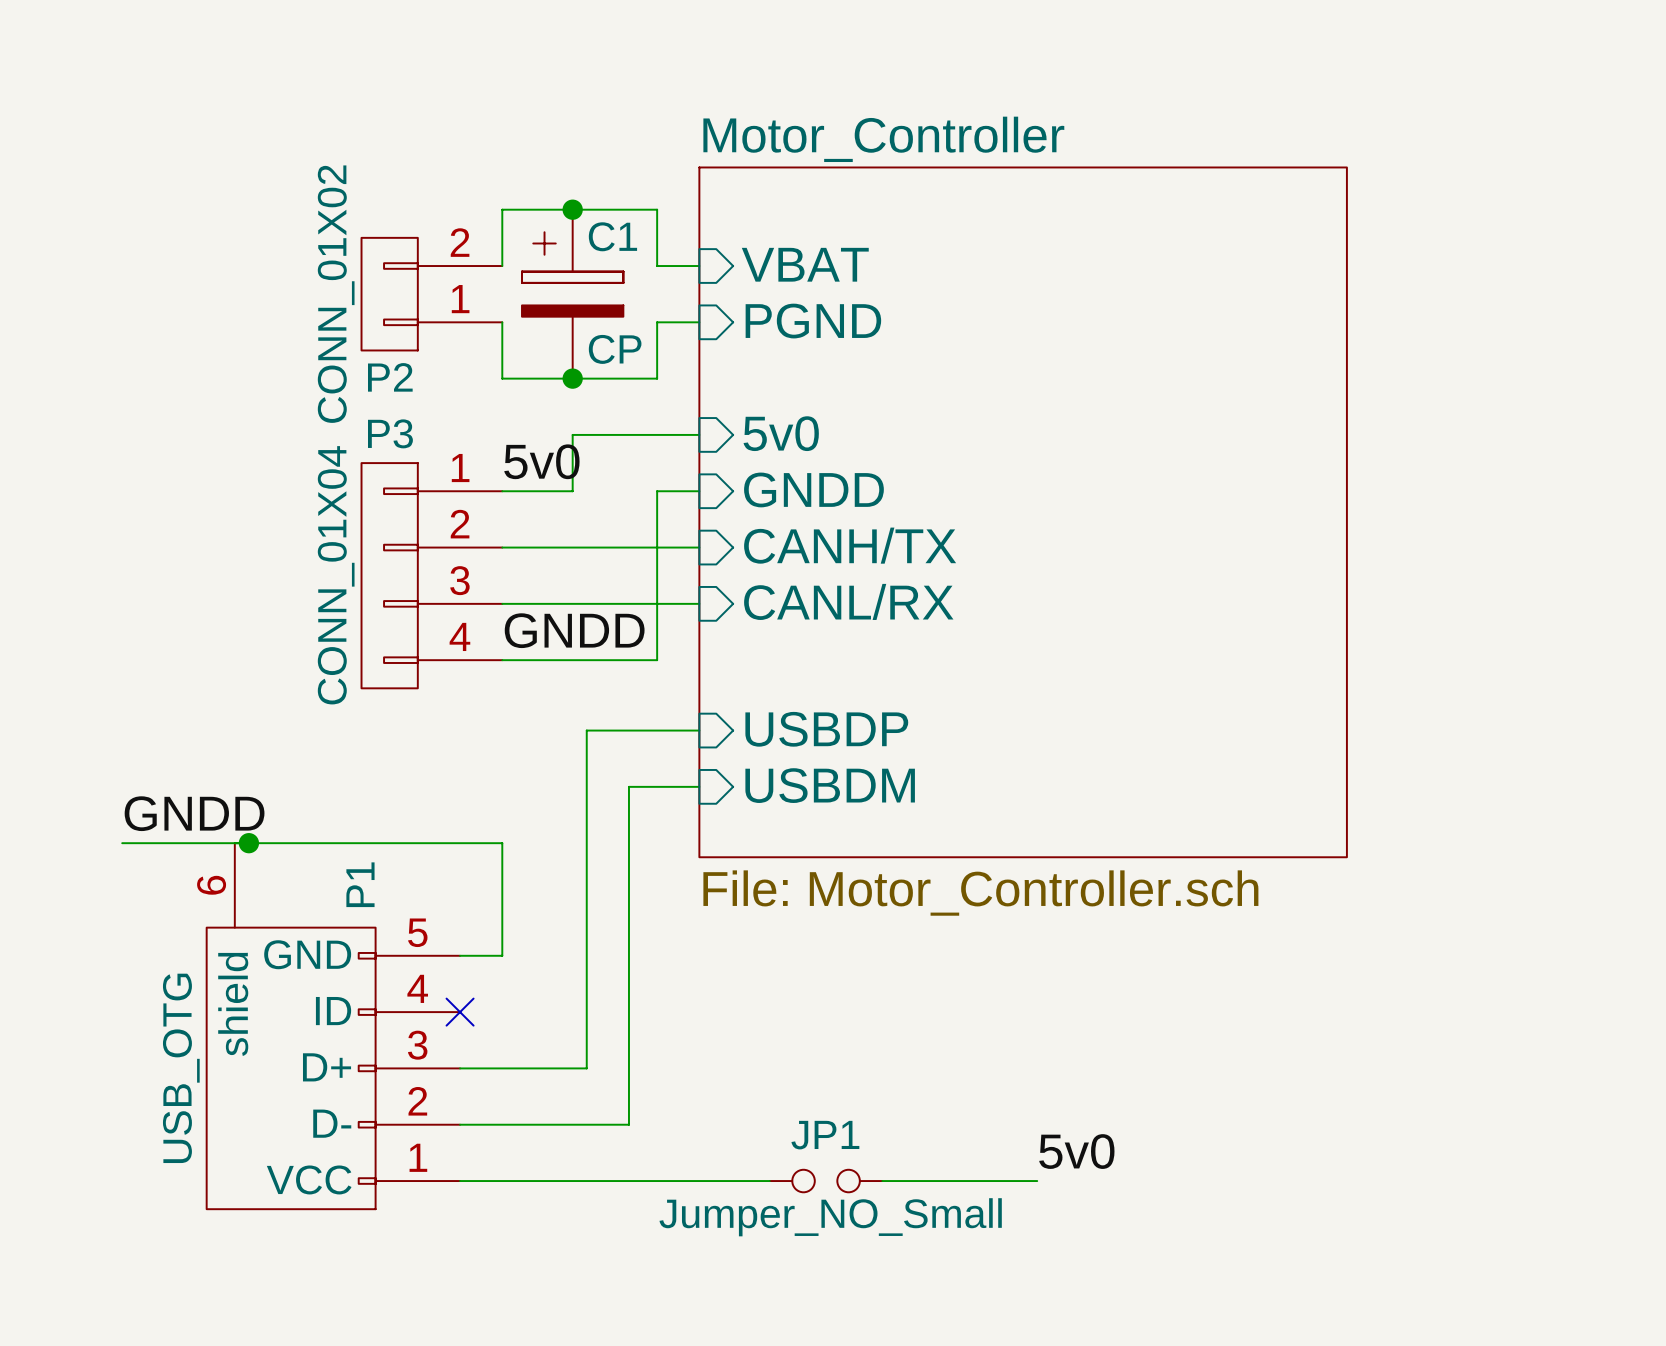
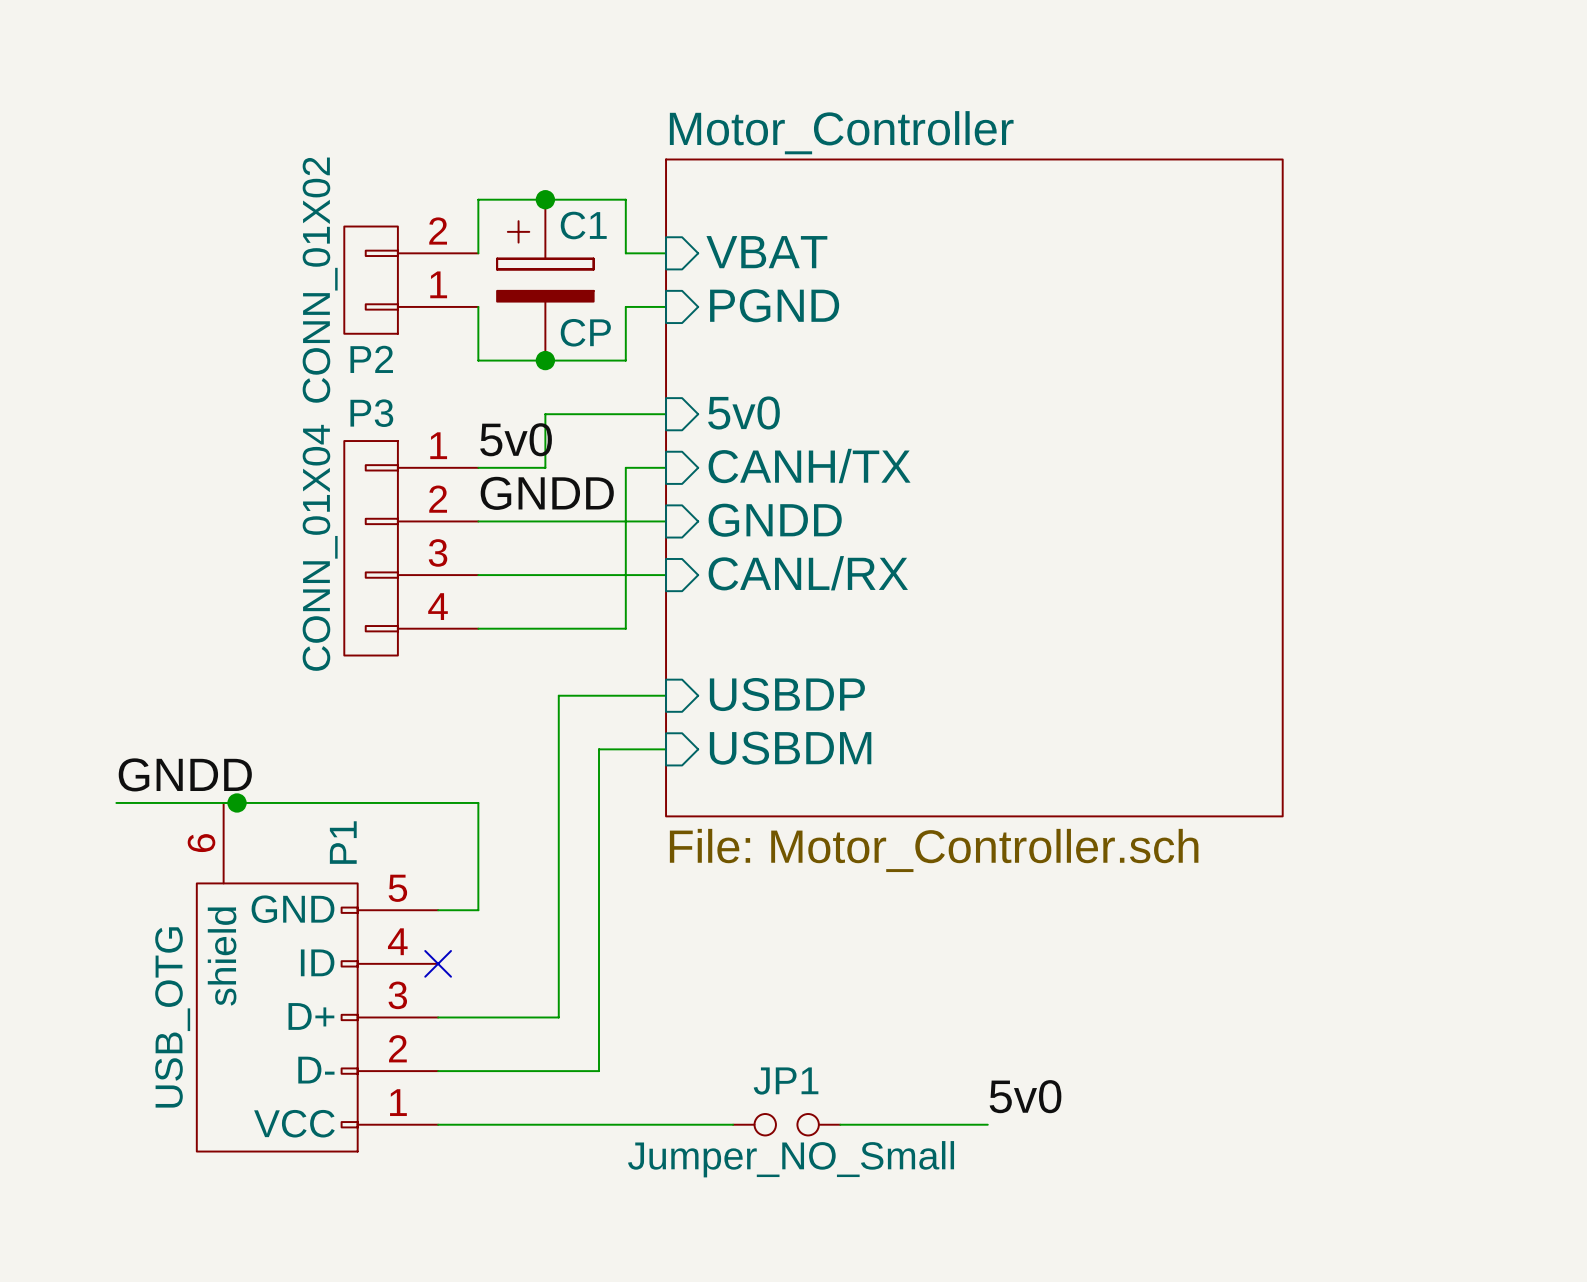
sheet pin: GNDD (813, 489) -> CANH/TX (809, 465)
sheet pin: CANH/TX (850, 545) -> GNDD (775, 520)
label position: GNDD (574, 630) -> GNDD (547, 493)

